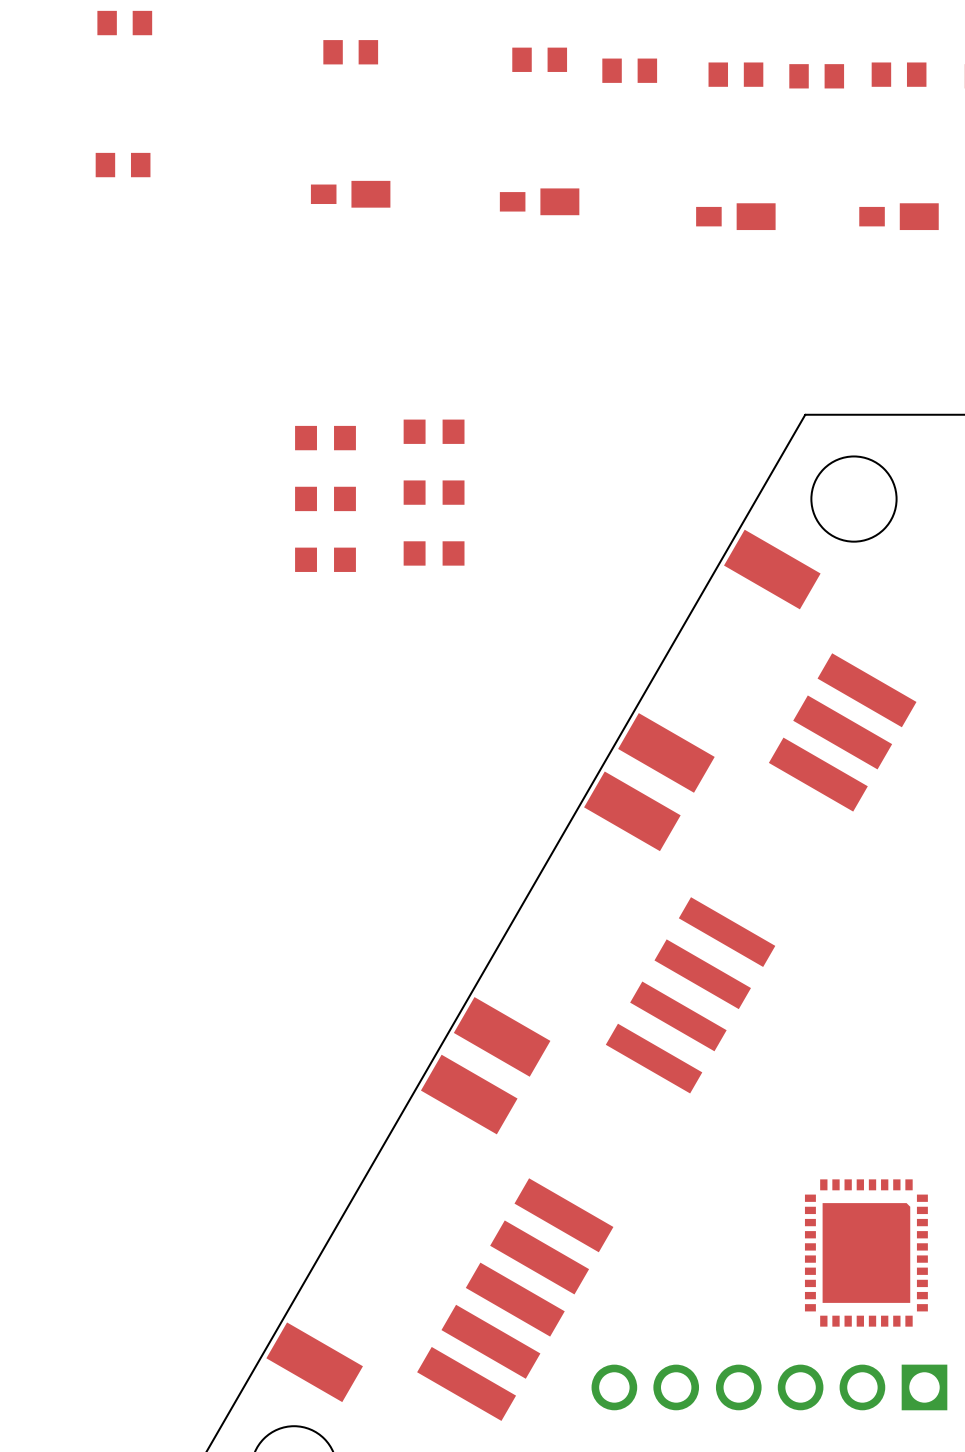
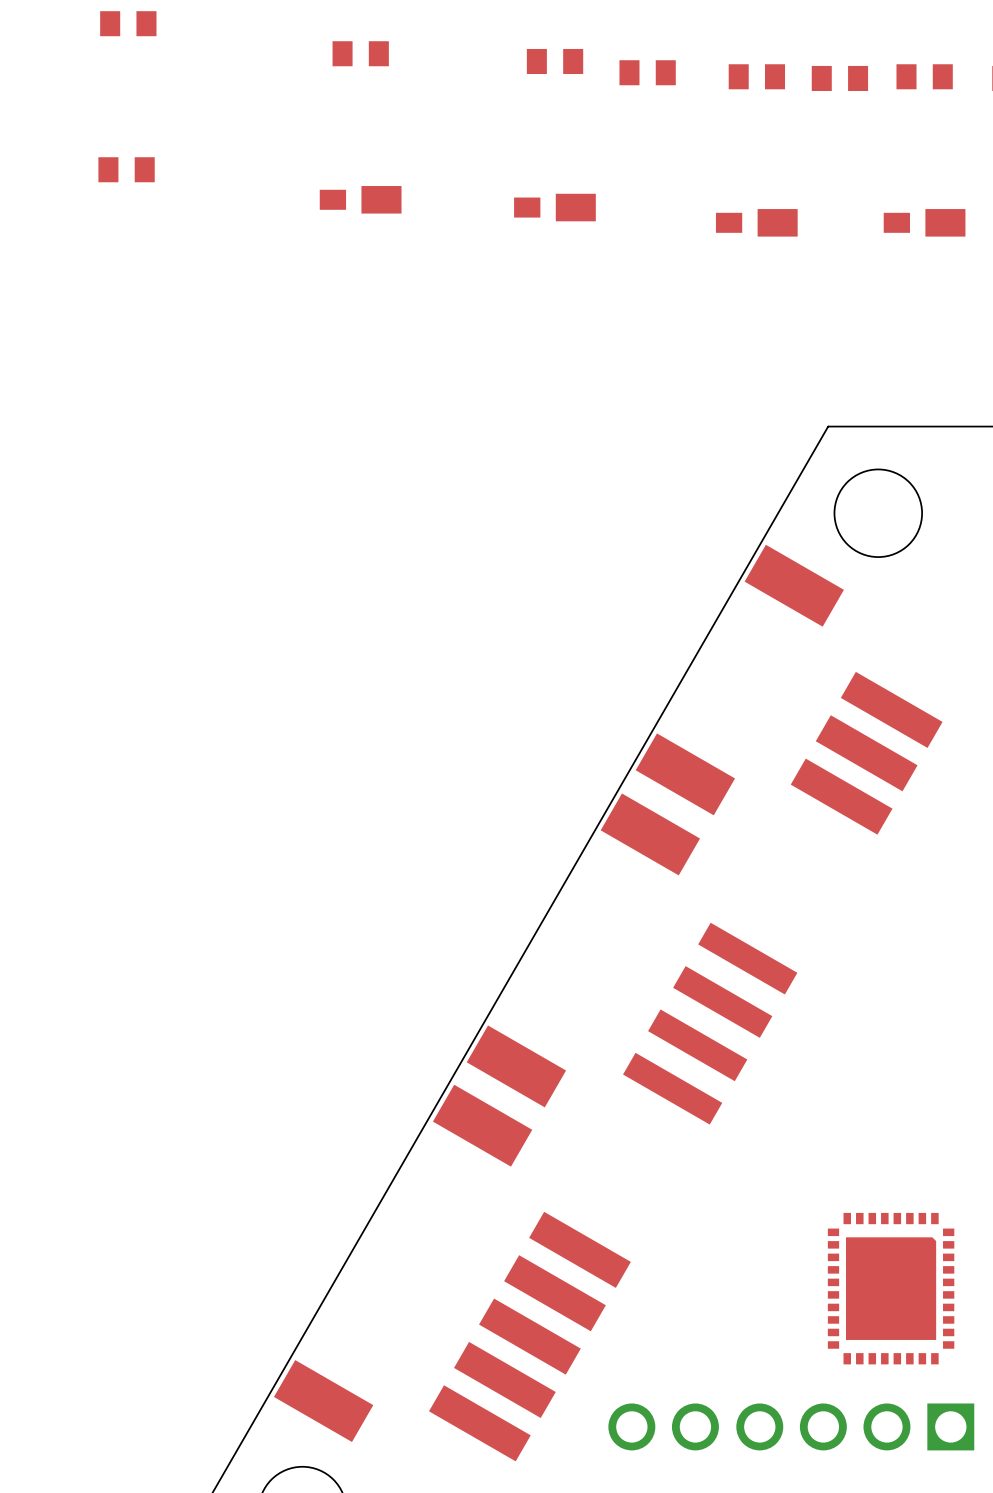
part: (434, 431) -> none
part: (325, 438) -> none
part: (434, 492) -> none
part: (325, 498) -> none
part: (434, 553) -> none
part: (325, 559) -> none

